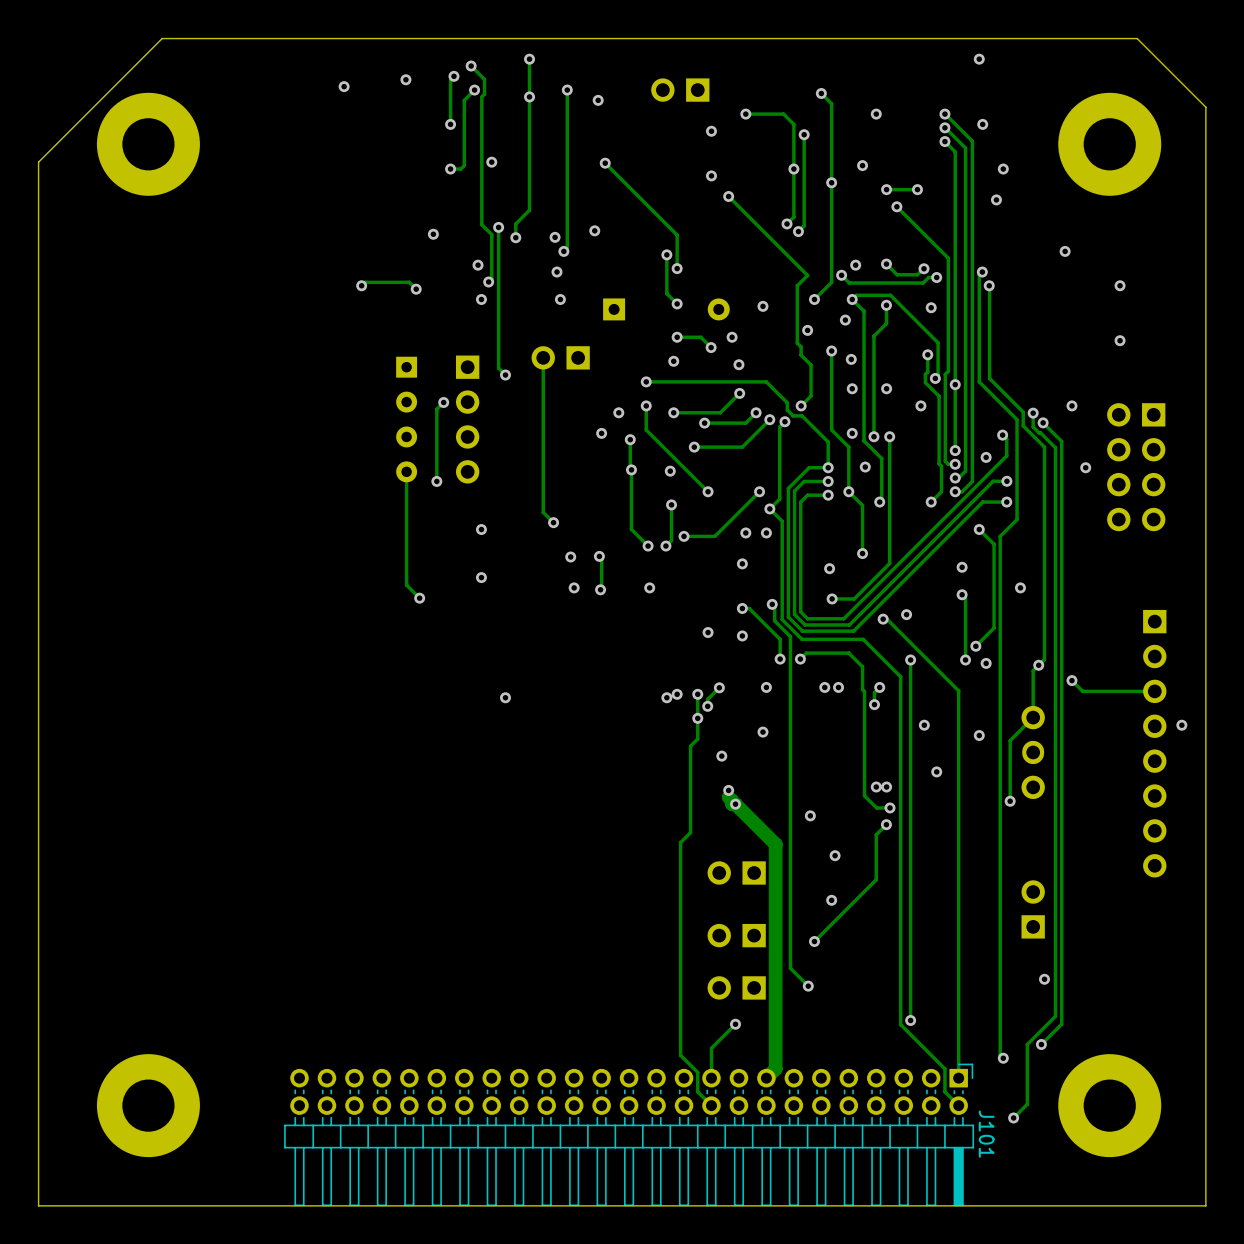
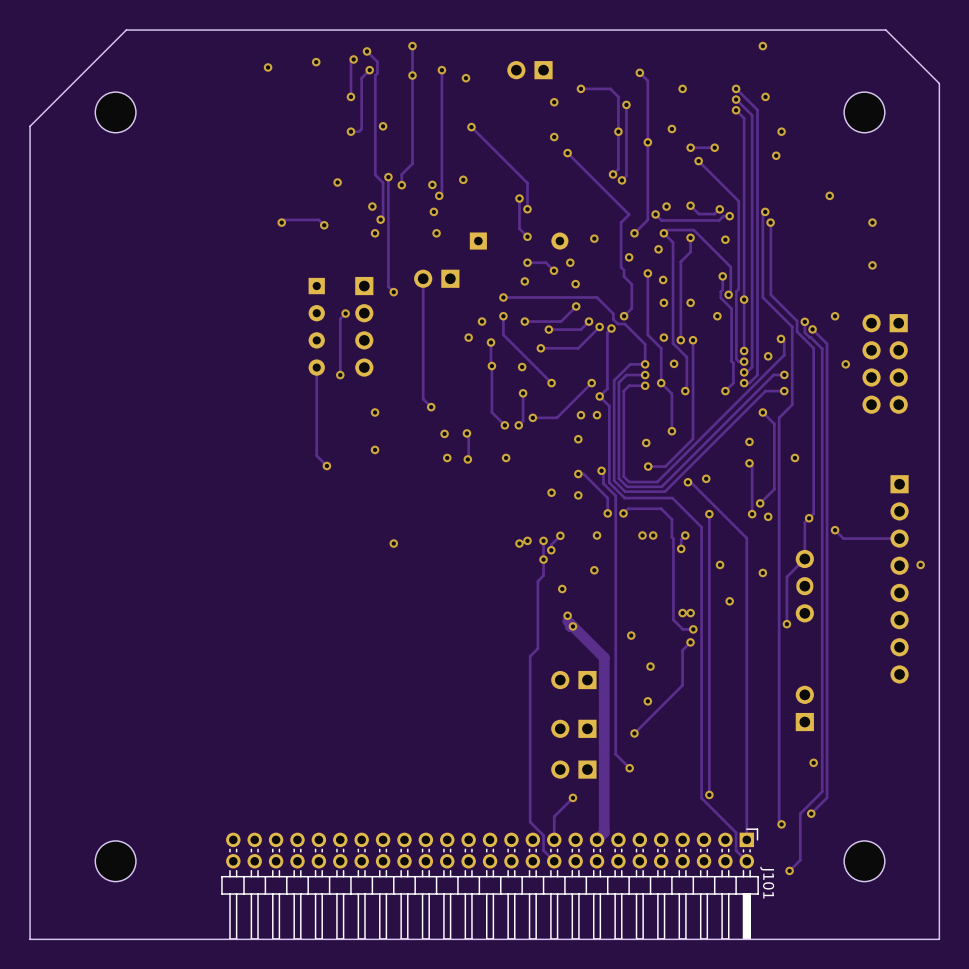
part footprint: [96, 92, 200, 196] -> [95, 92, 136, 133]
part footprint: [1058, 92, 1162, 196] -> [844, 92, 885, 133]
part footprint: [96, 1054, 200, 1158] -> [95, 840, 136, 882]
part footprint: [1058, 1054, 1162, 1158] -> [844, 840, 885, 882]

